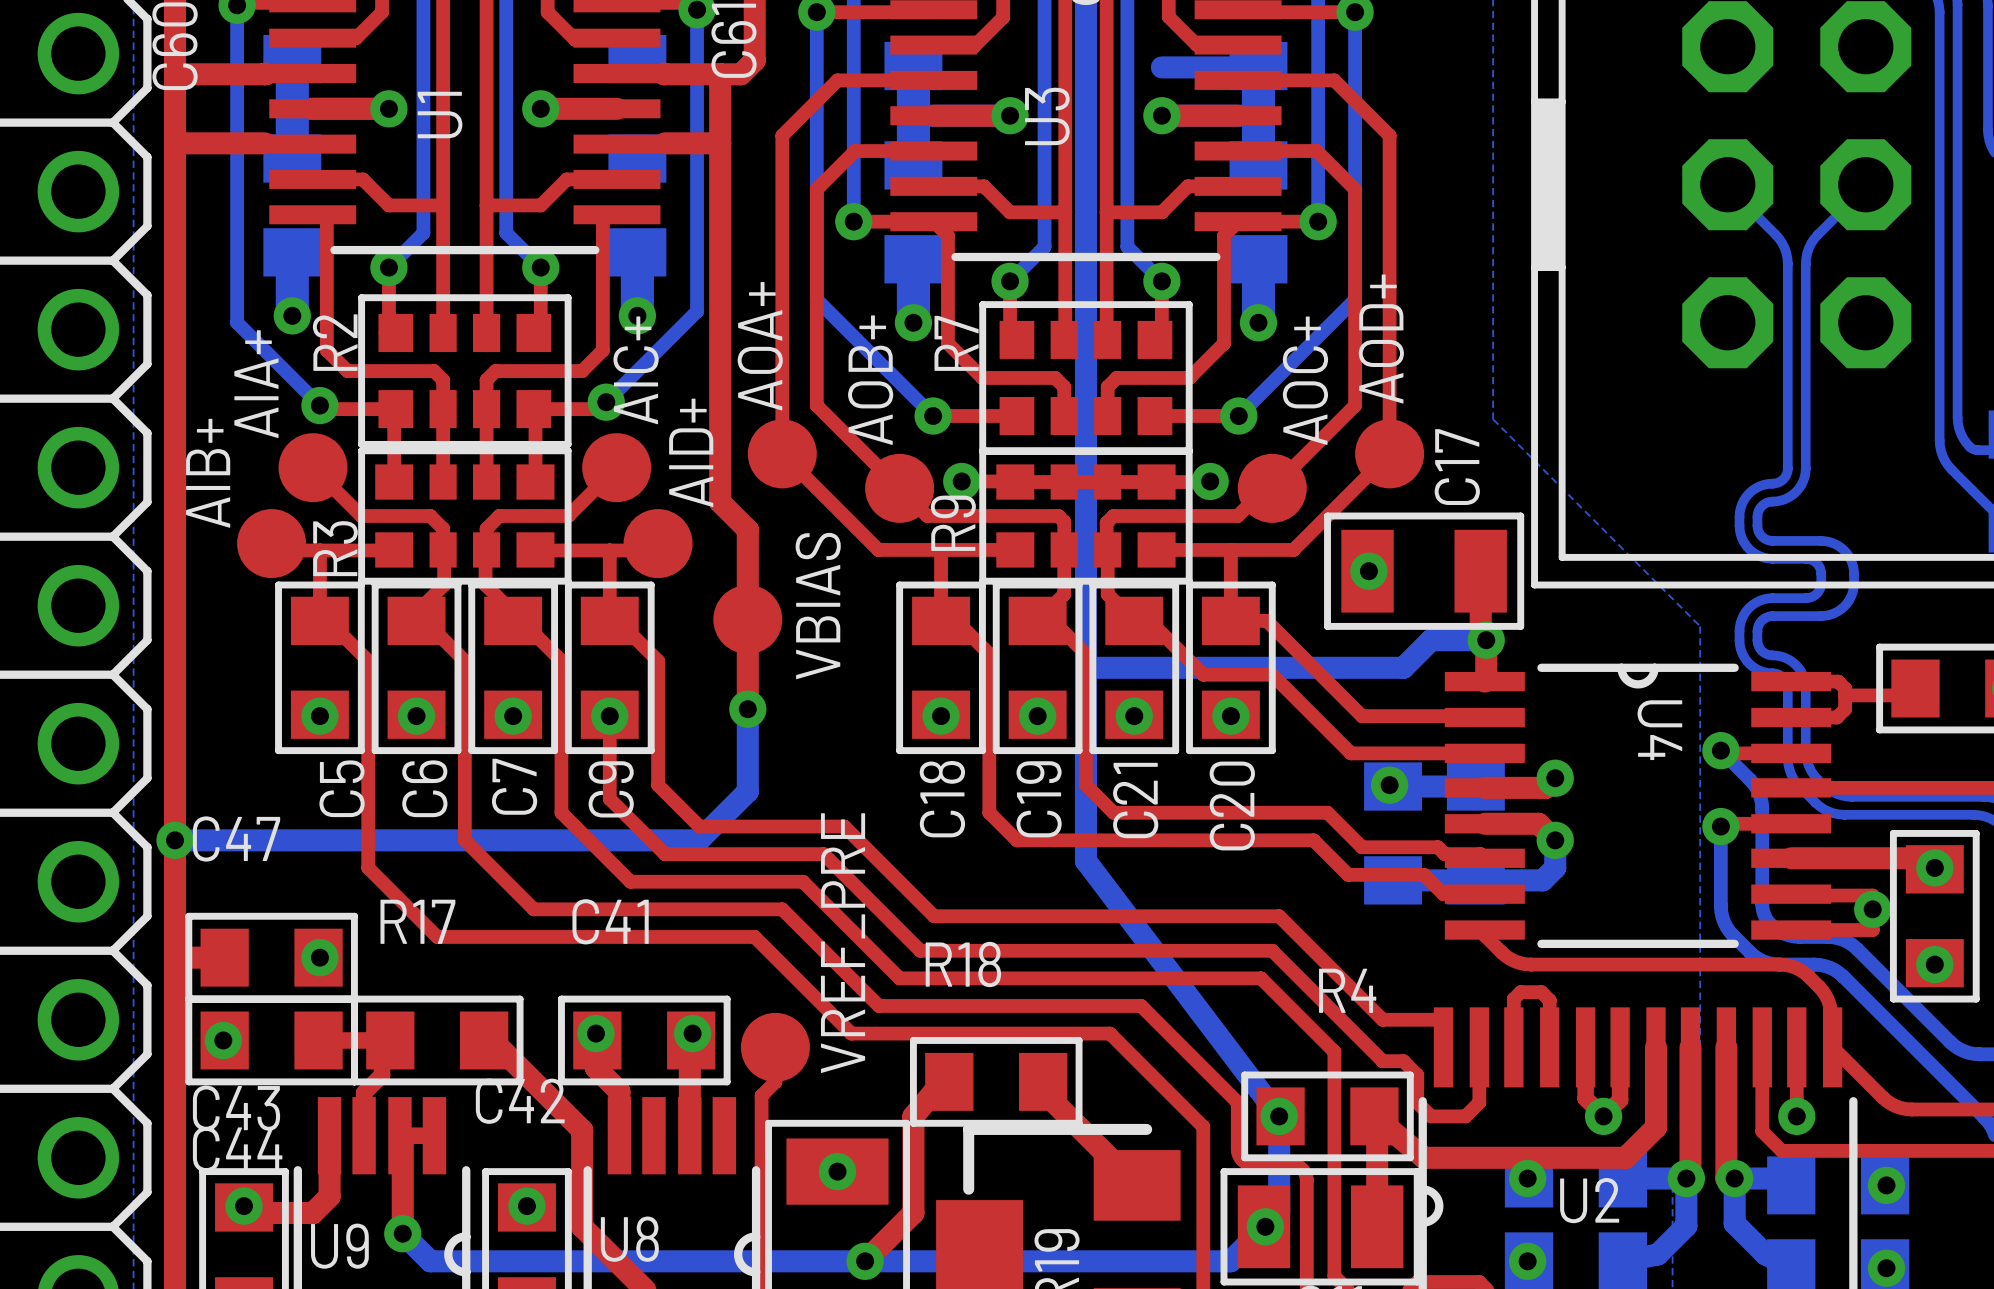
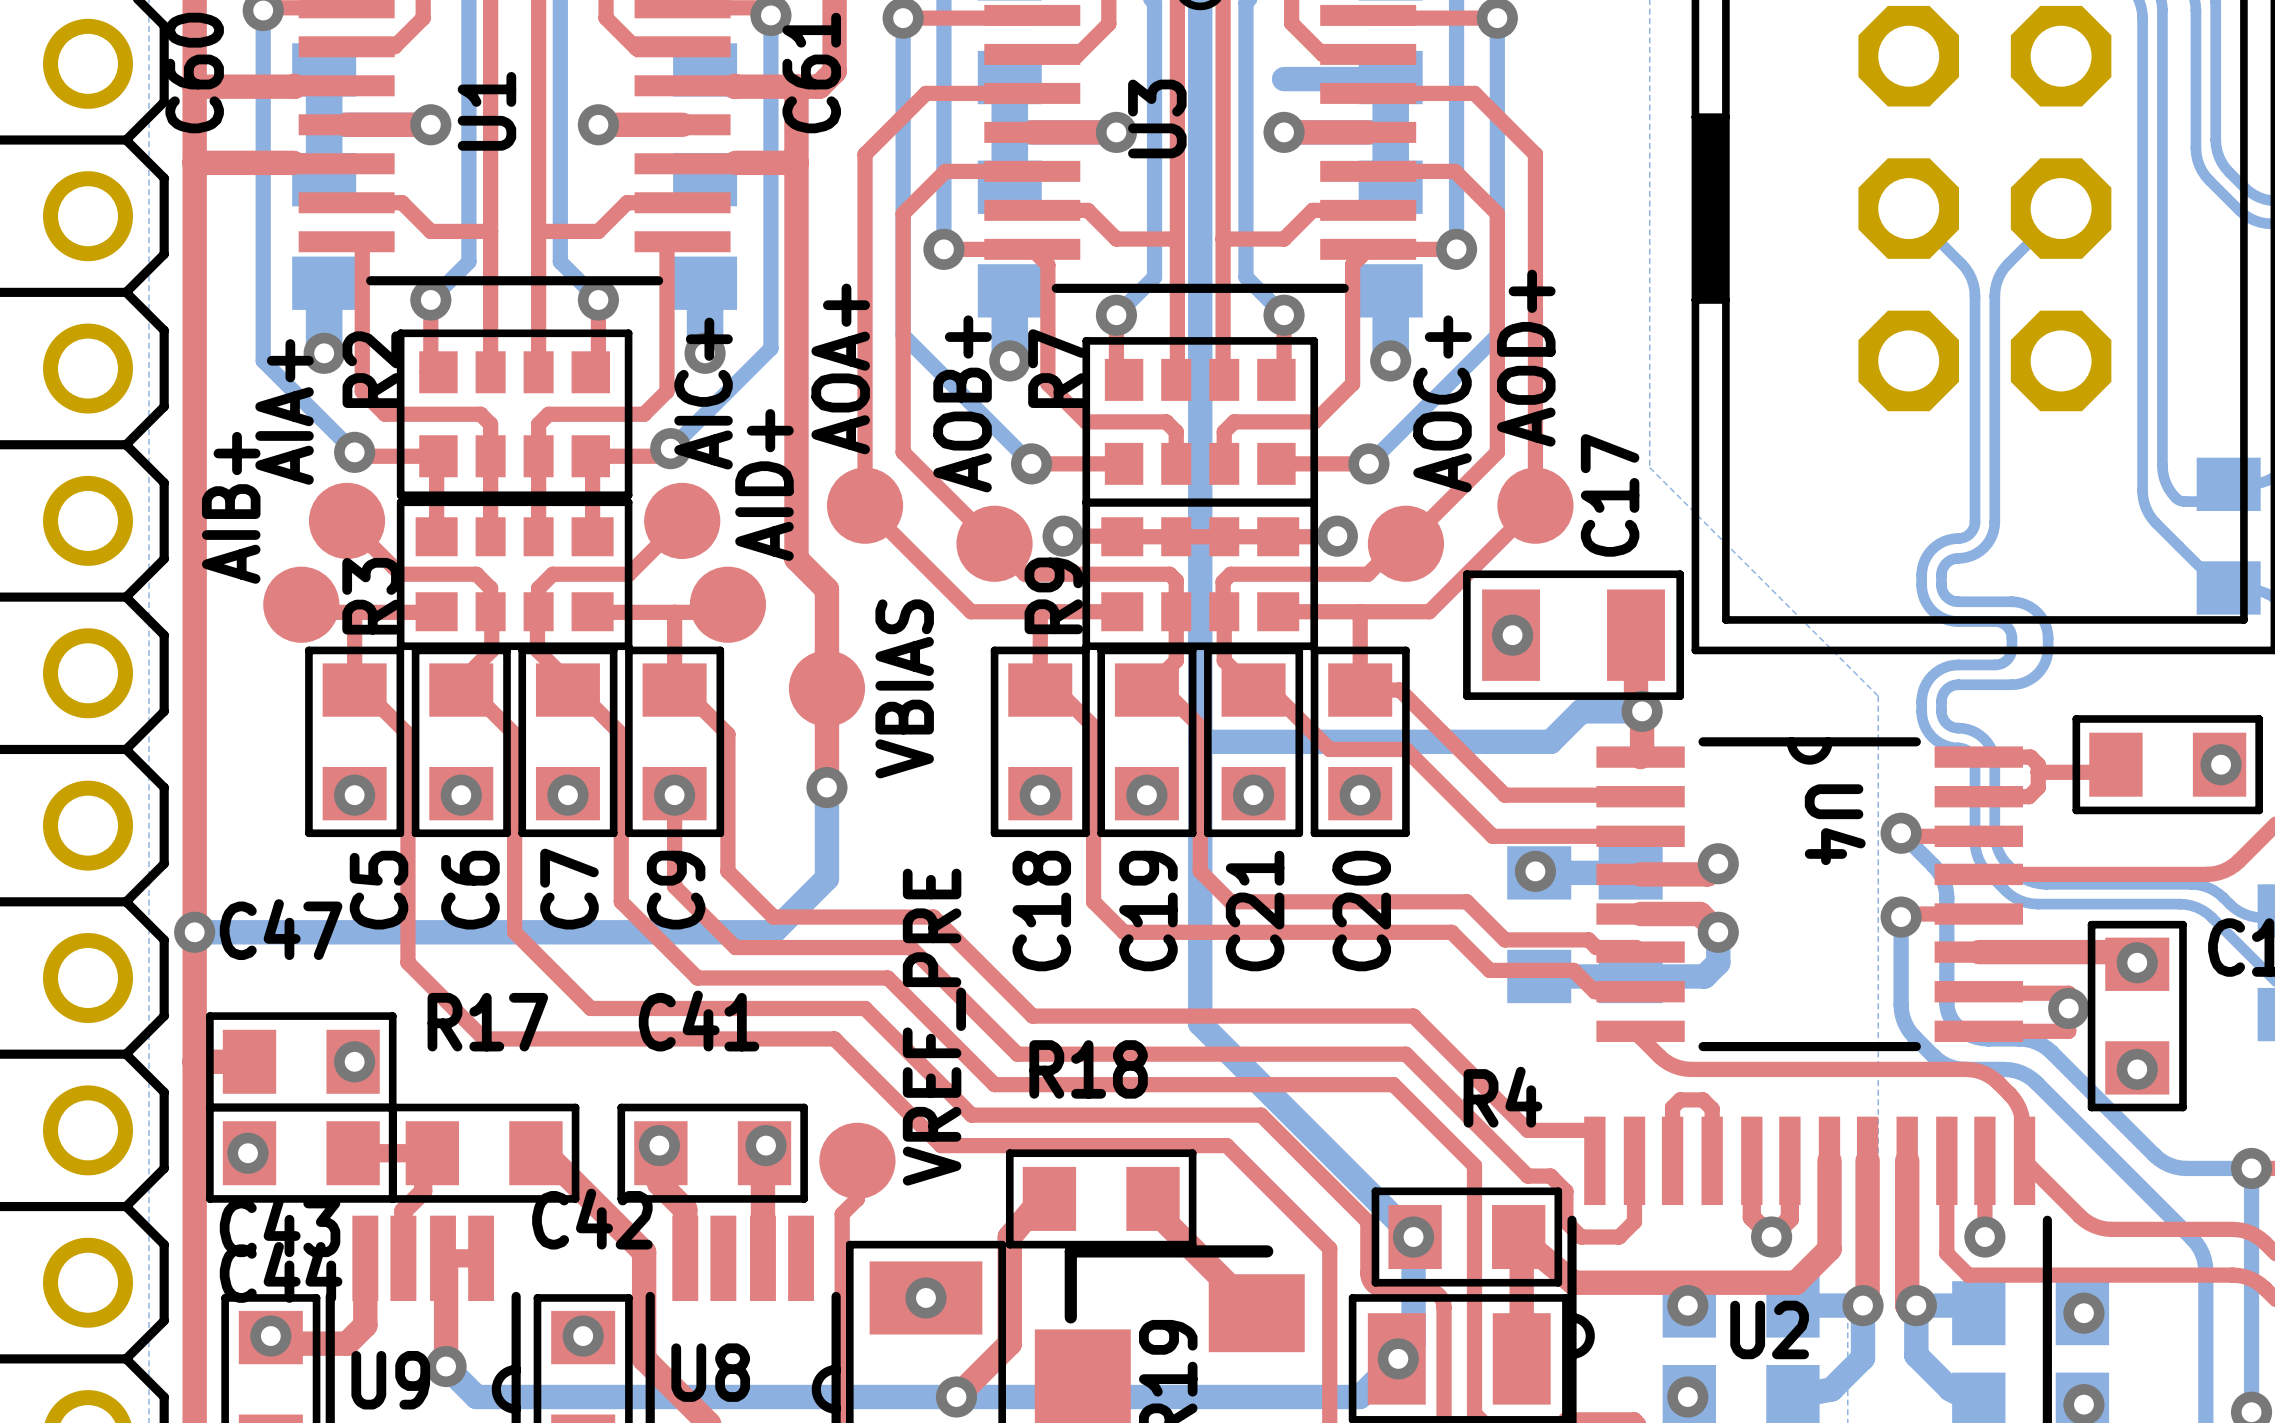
bottom track: (1085, 861) (1279, 1116) -> (1200, 955) (1200, 1023) (1413, 1237)

